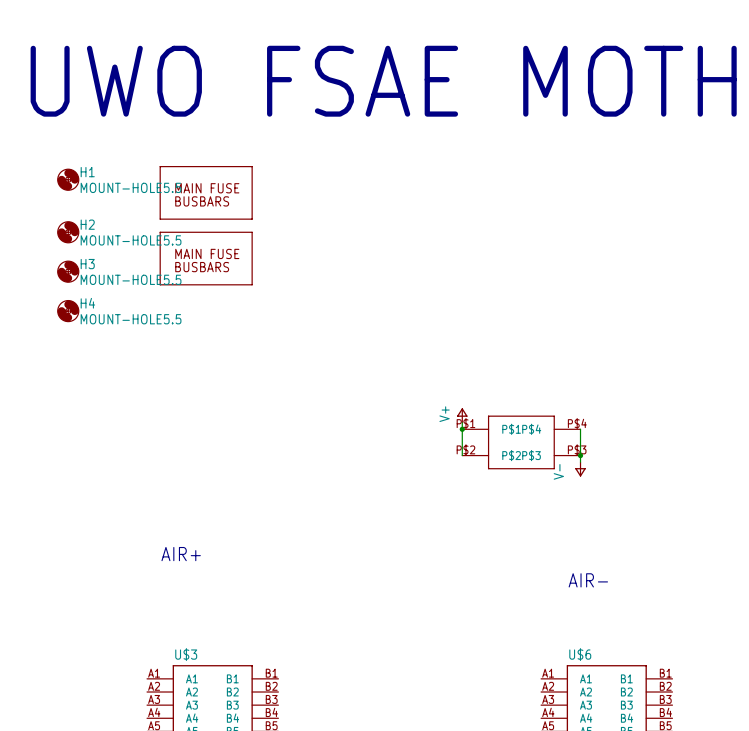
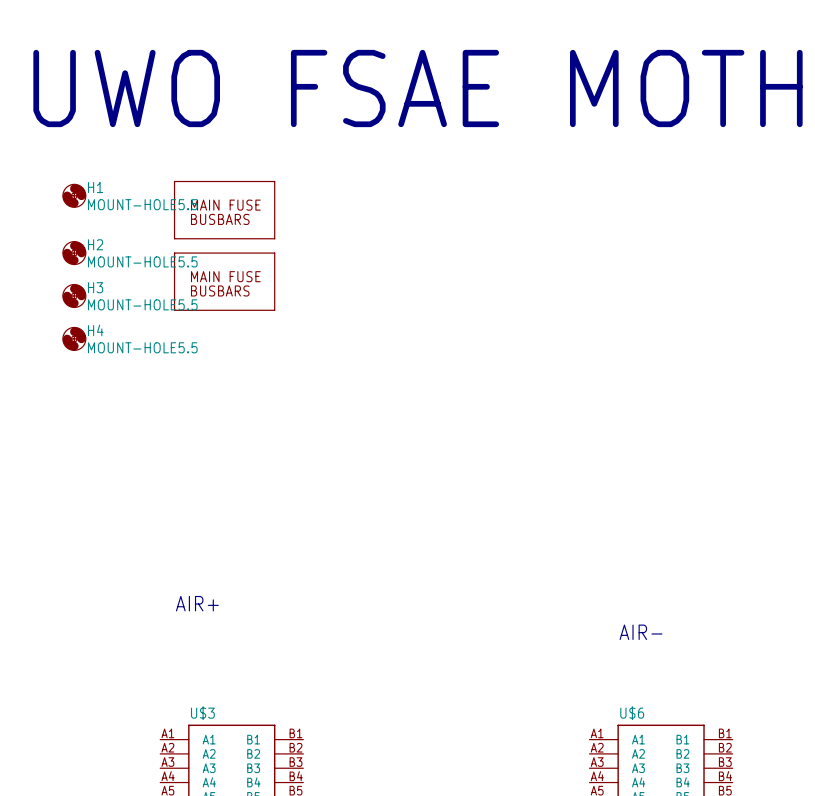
power symbol: V+ (462, 415) -> none
wire: (462, 422) (462, 455) -> none
junction: (462, 429) -> none
wire: (580, 429) (580, 462) -> none
part: (521, 442) -> none
junction: (580, 455) -> none
power symbol: V- (580, 469) -> none

